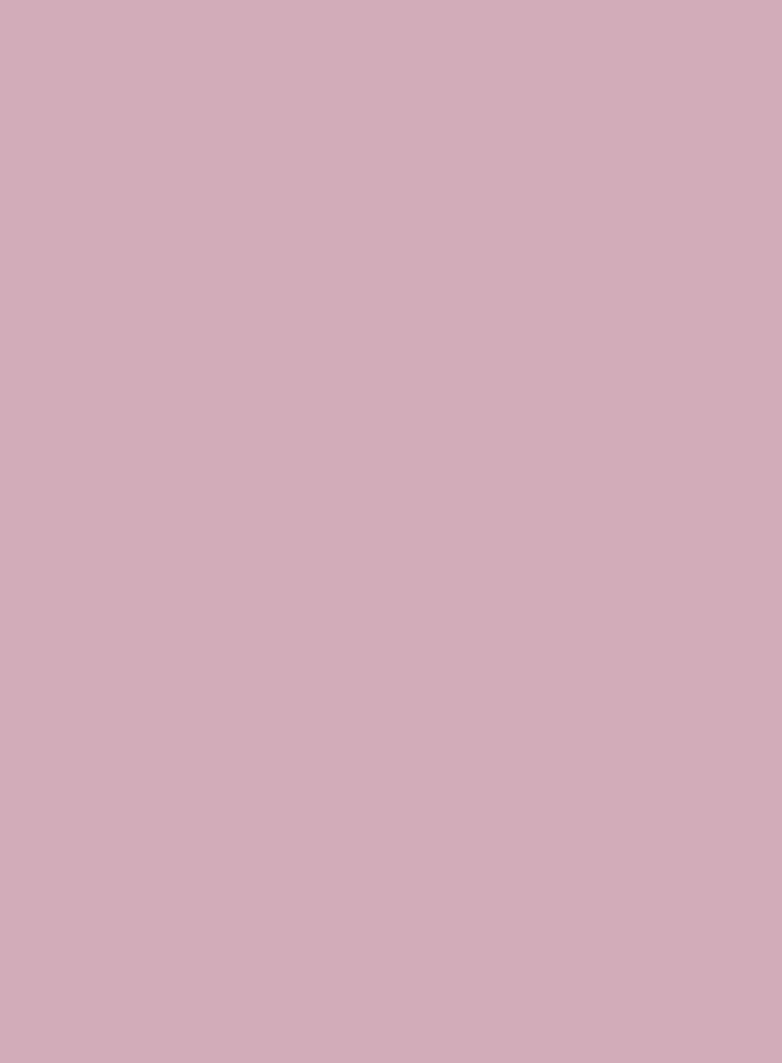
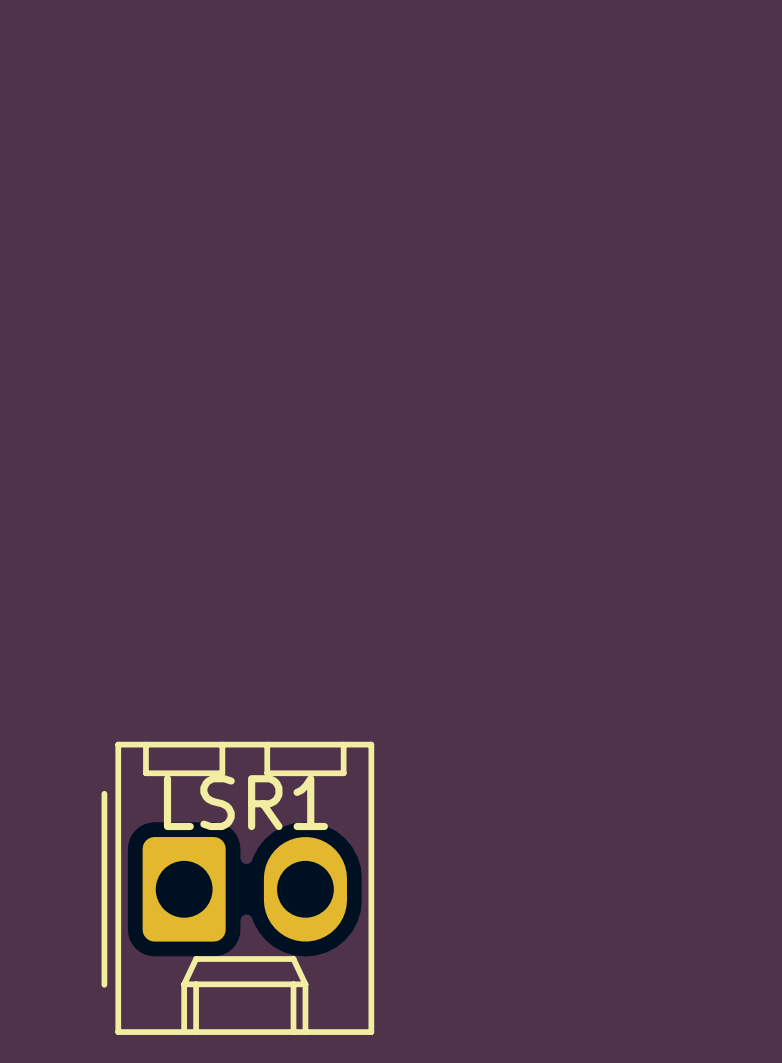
LSR1: none -> (237, 888)

